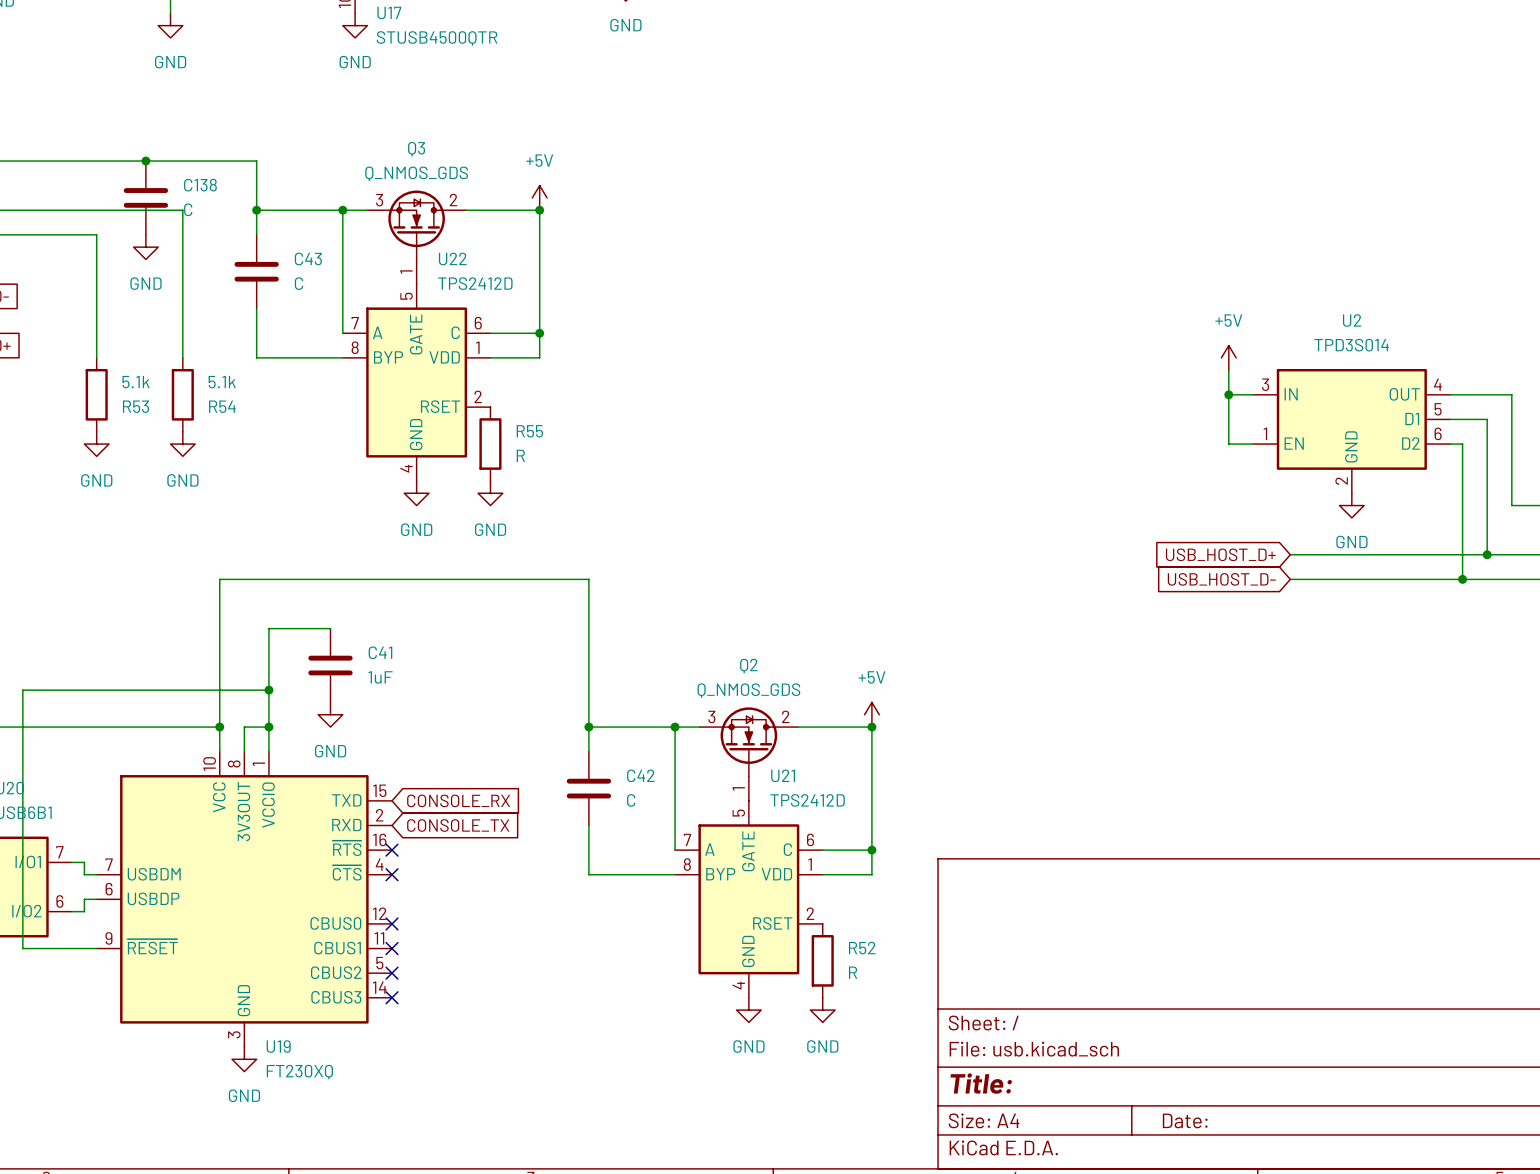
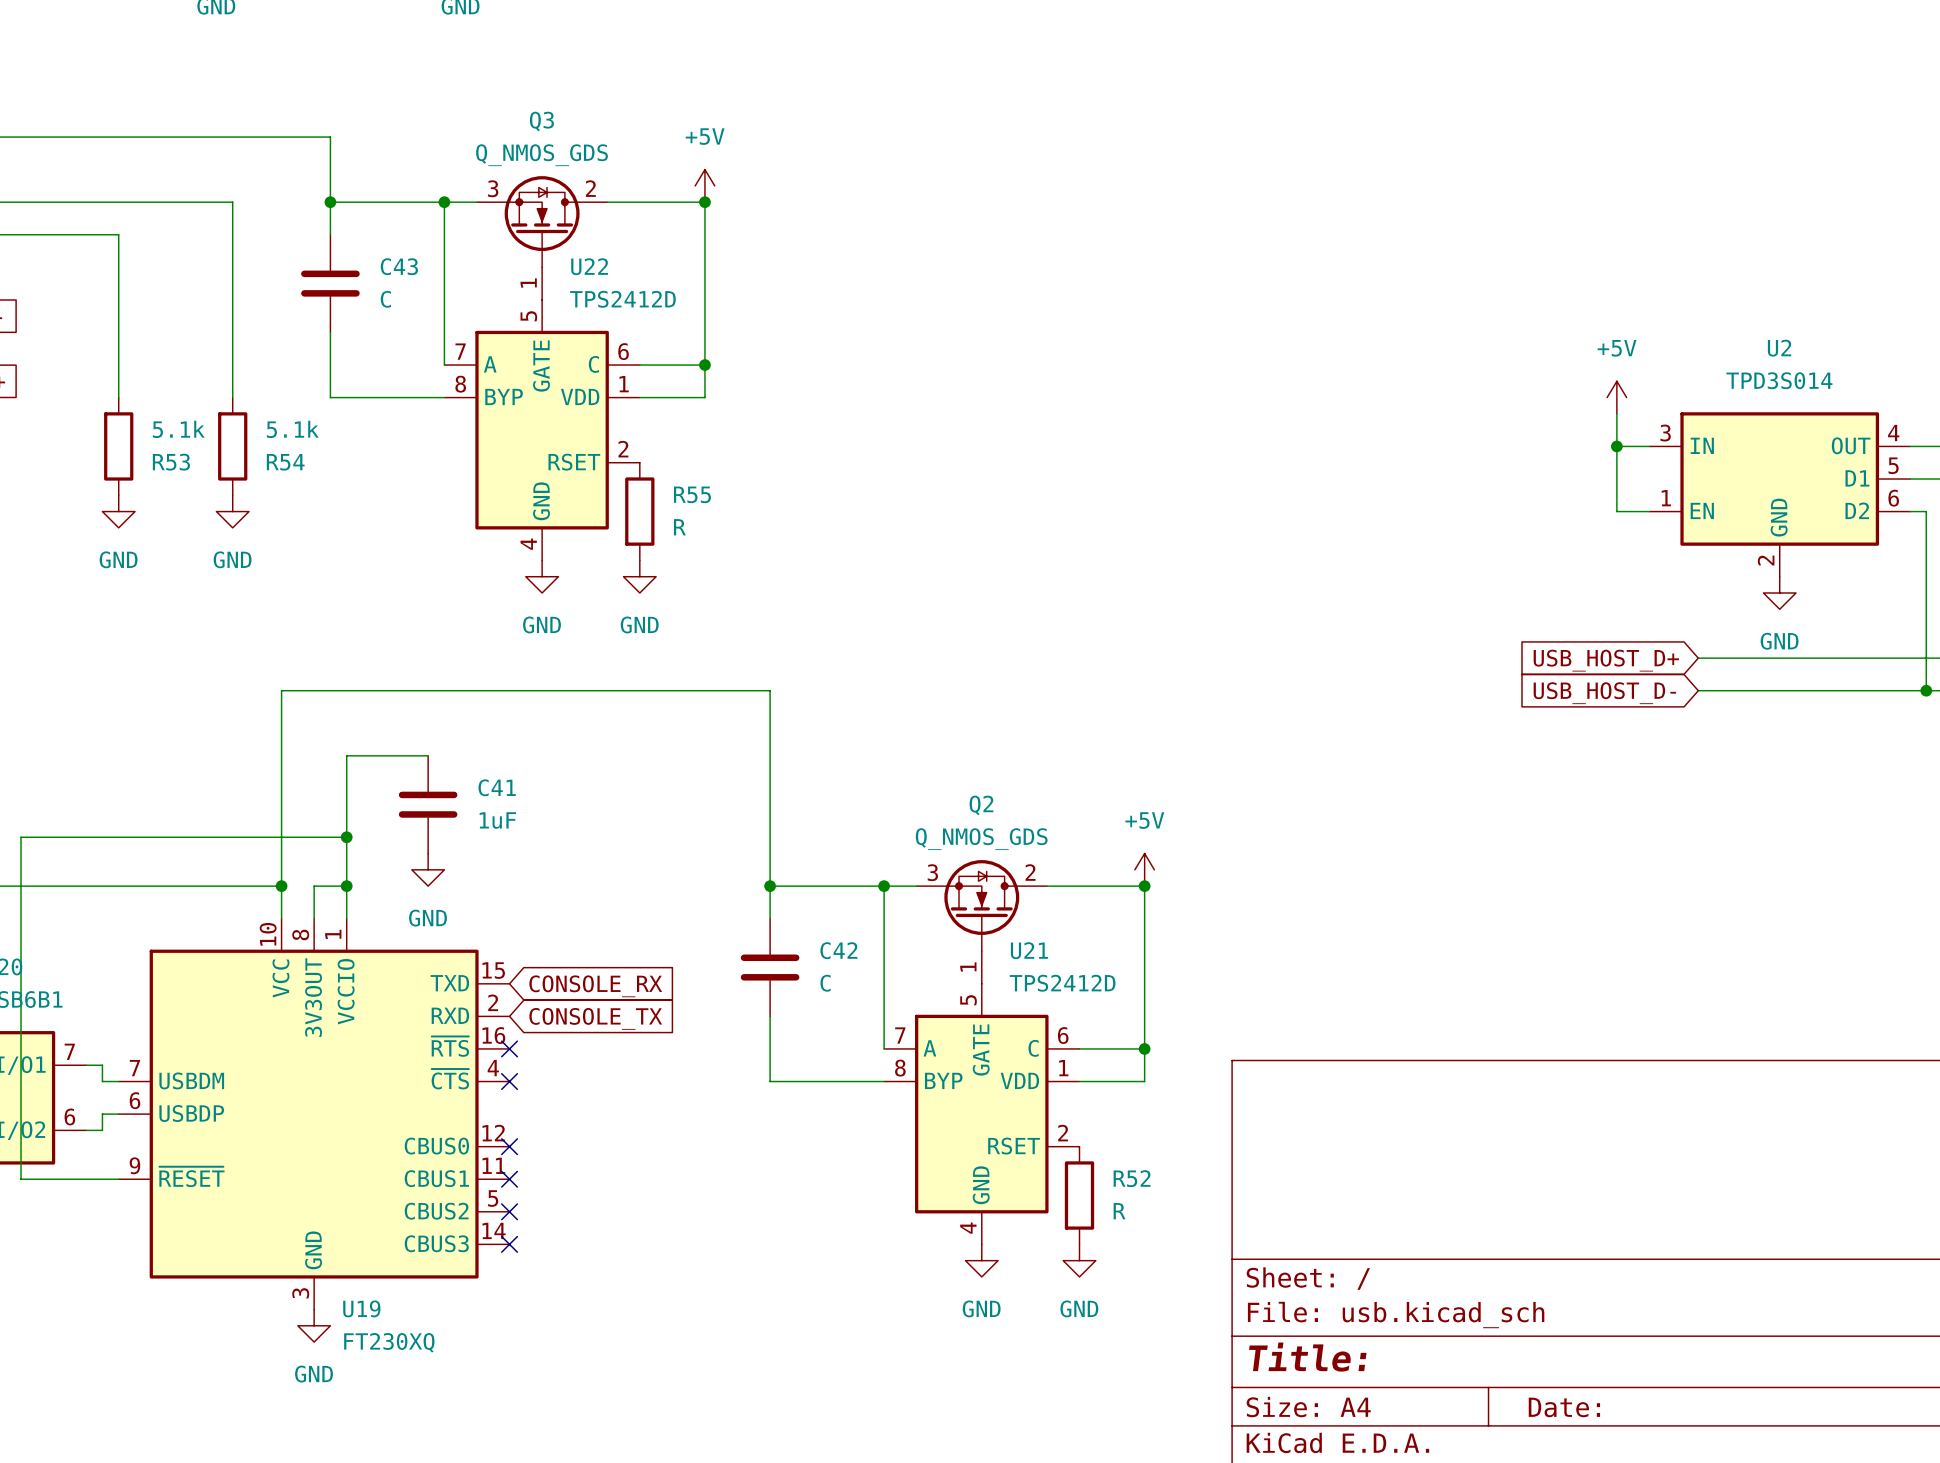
junction: (145, 161) -> none
C138: C (145, 197) -> none
power symbol: GND (145, 247) -> none

